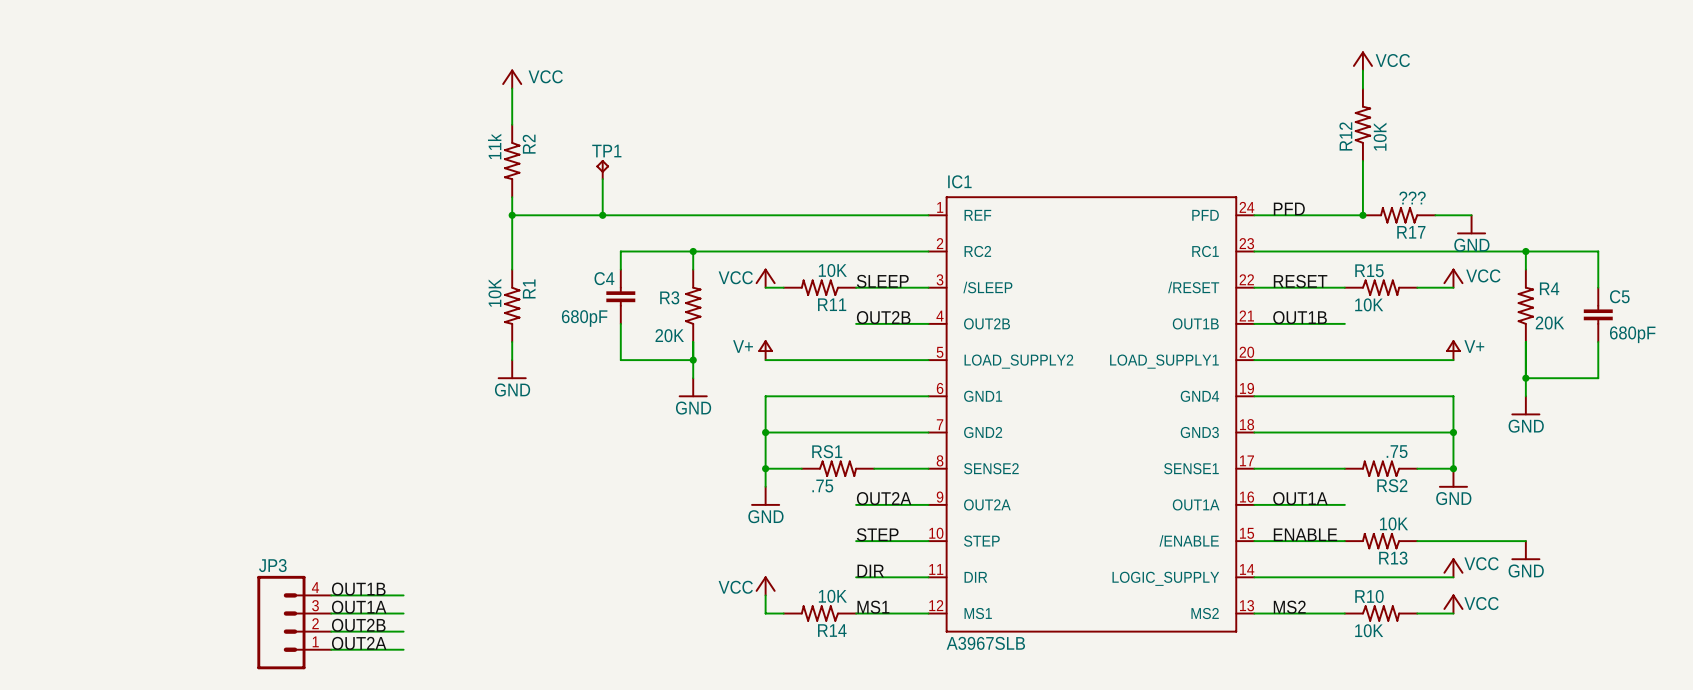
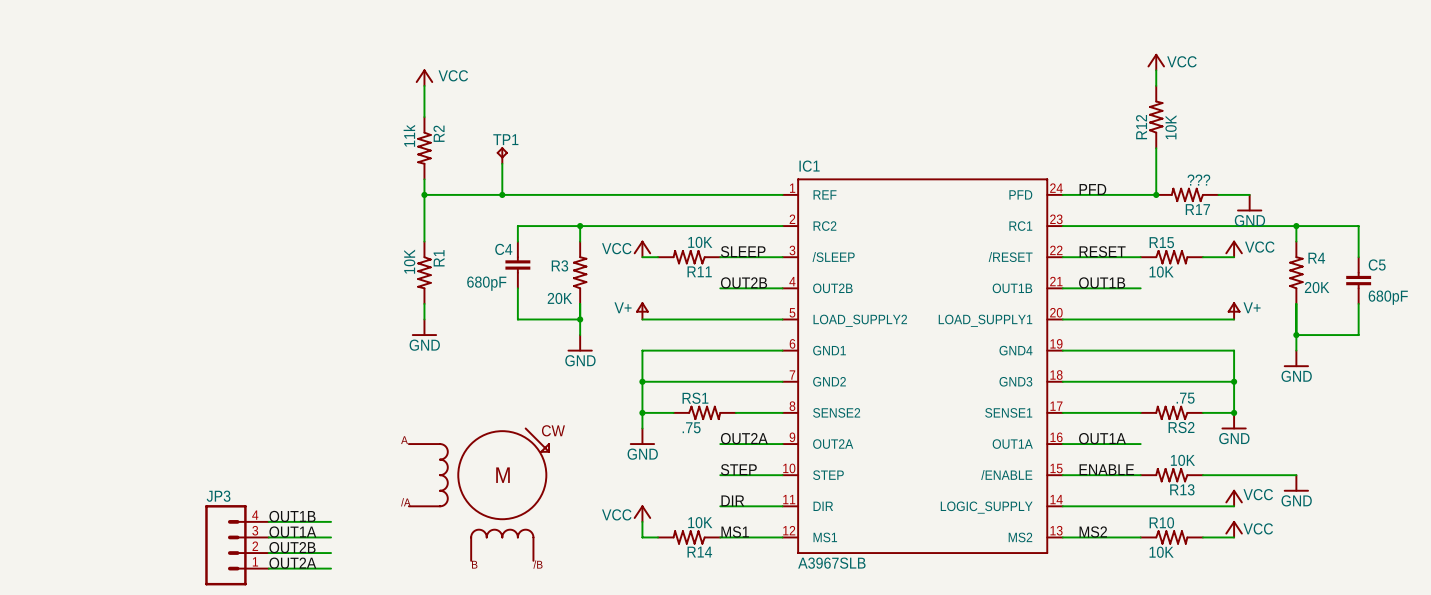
part: none -> (478, 494)

